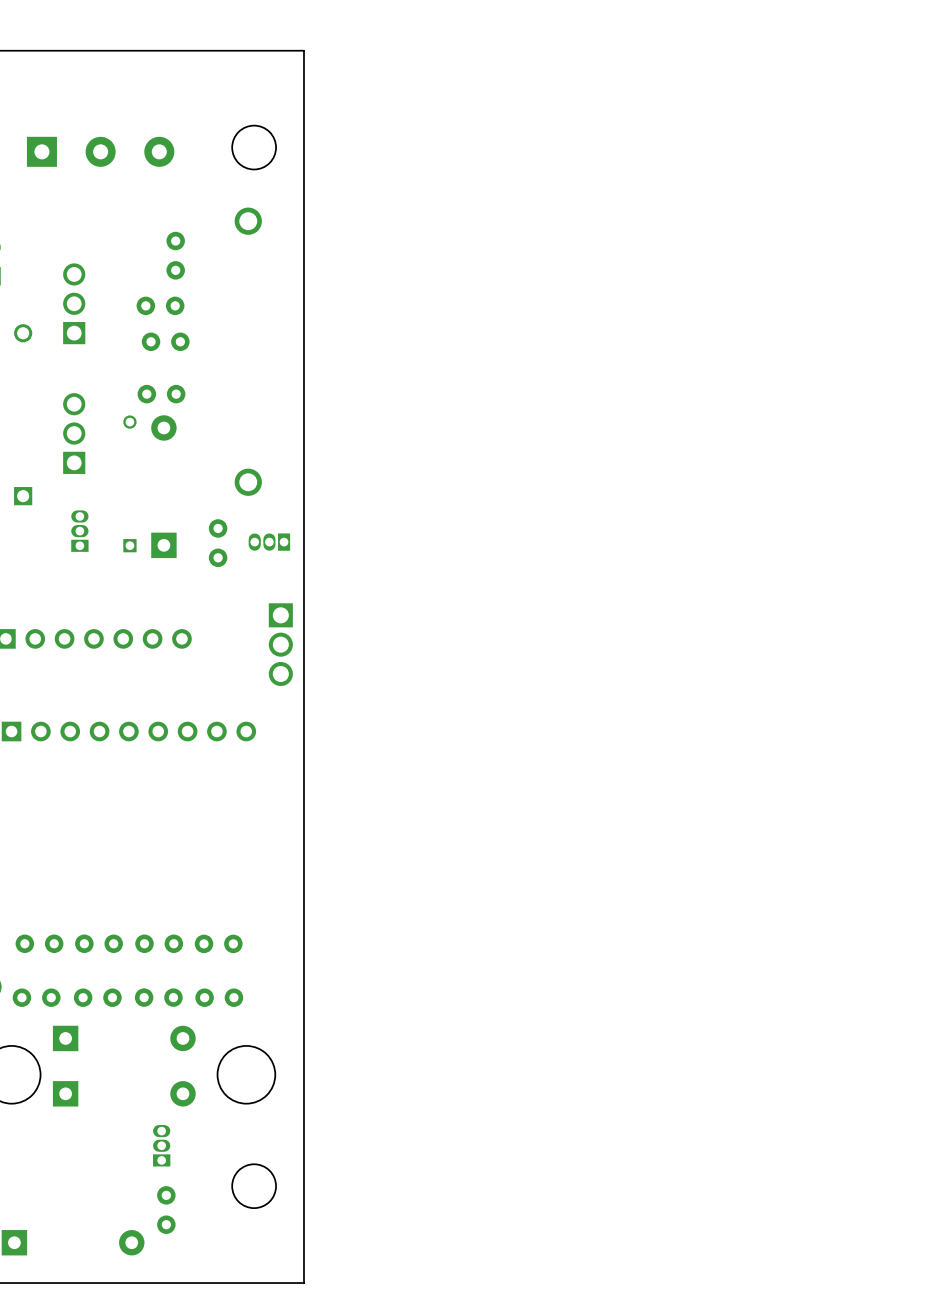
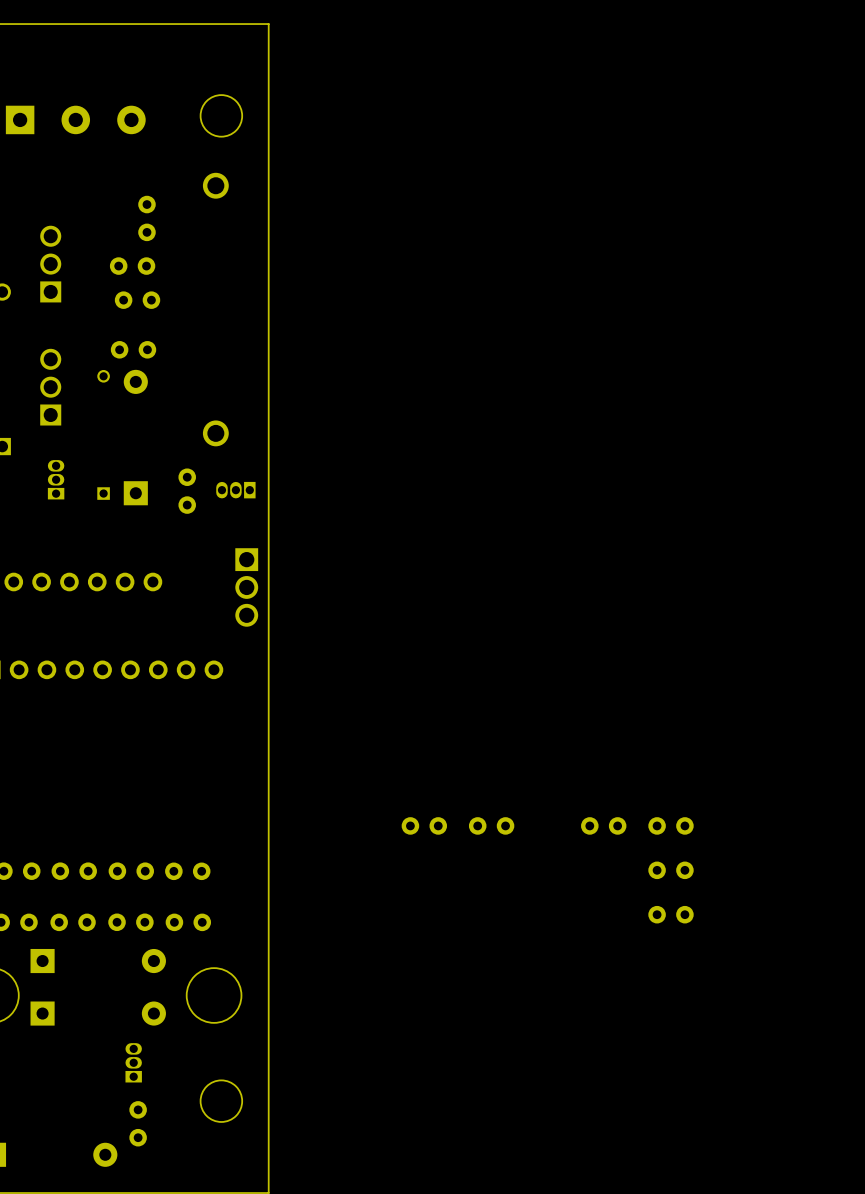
part: none -> (424, 825)
part: none -> (491, 825)
part: none -> (603, 825)
part: none -> (671, 825)
part: none -> (671, 870)
part: none -> (671, 914)

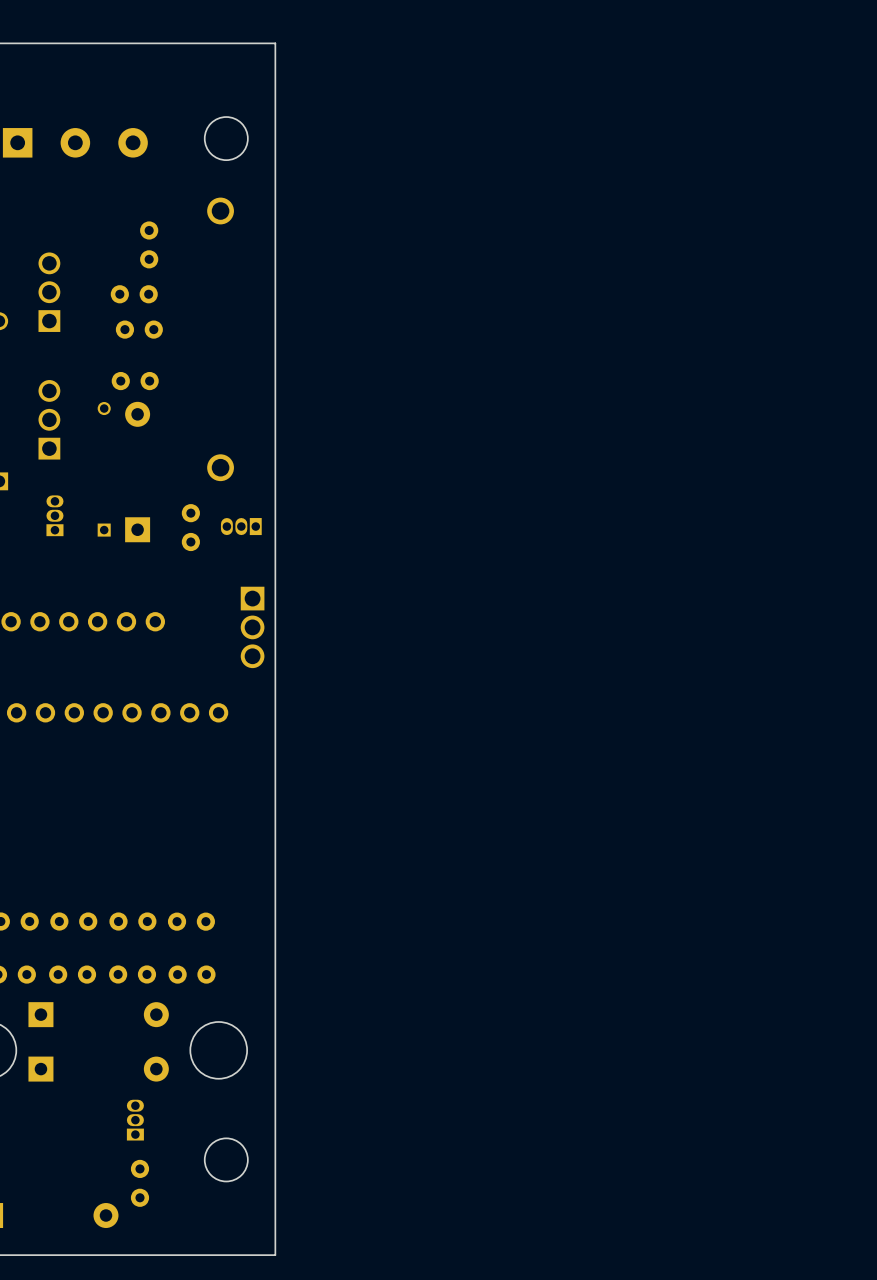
part: (424, 825) -> none
part: (491, 825) -> none
part: (603, 825) -> none
part: (671, 825) -> none
part: (671, 870) -> none
part: (671, 914) -> none

